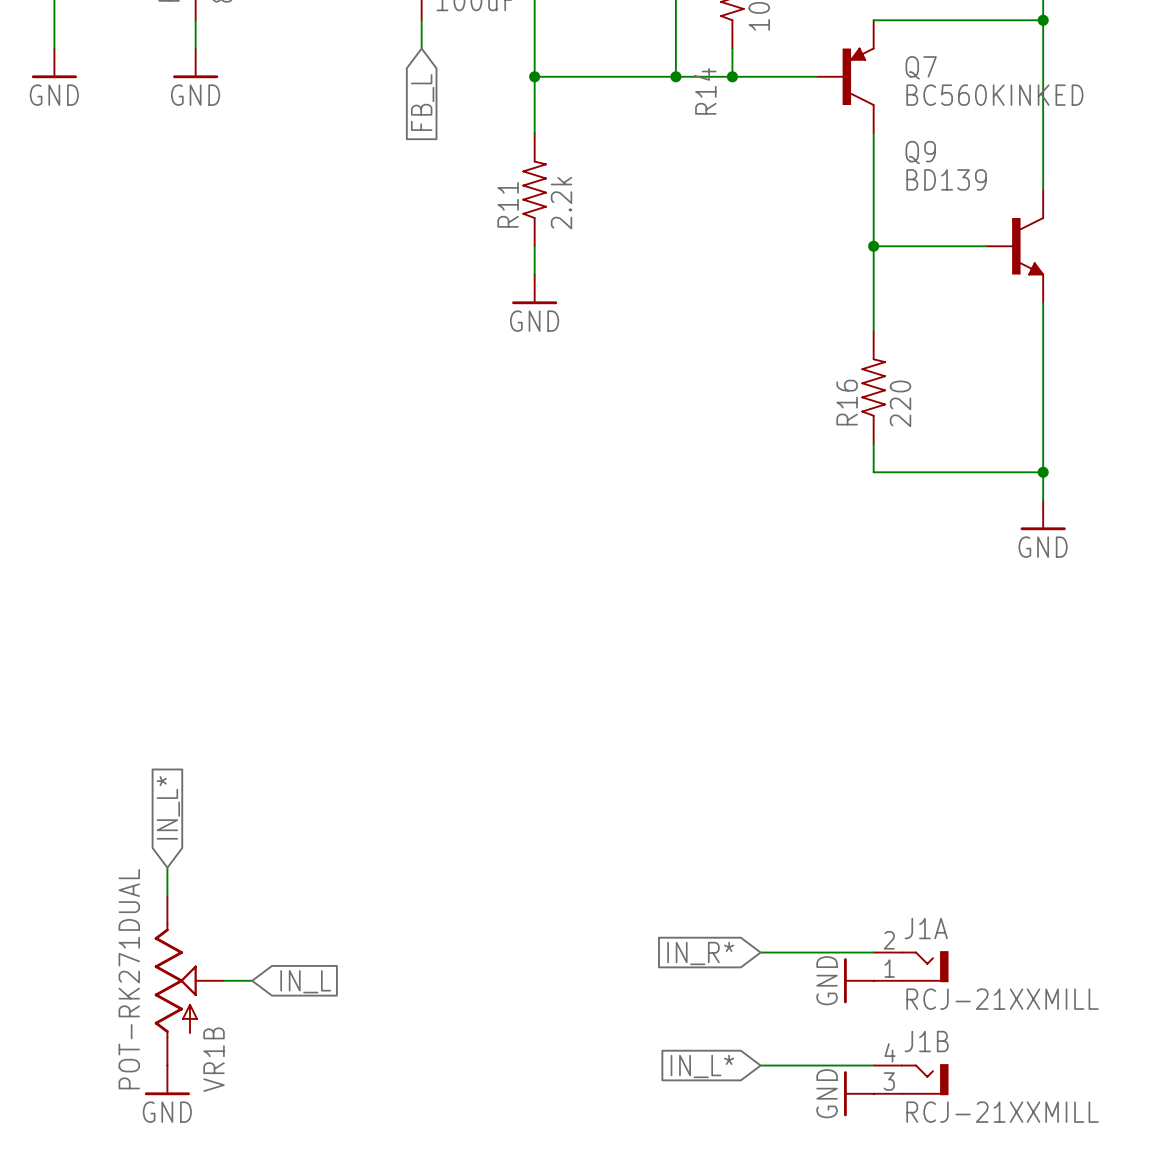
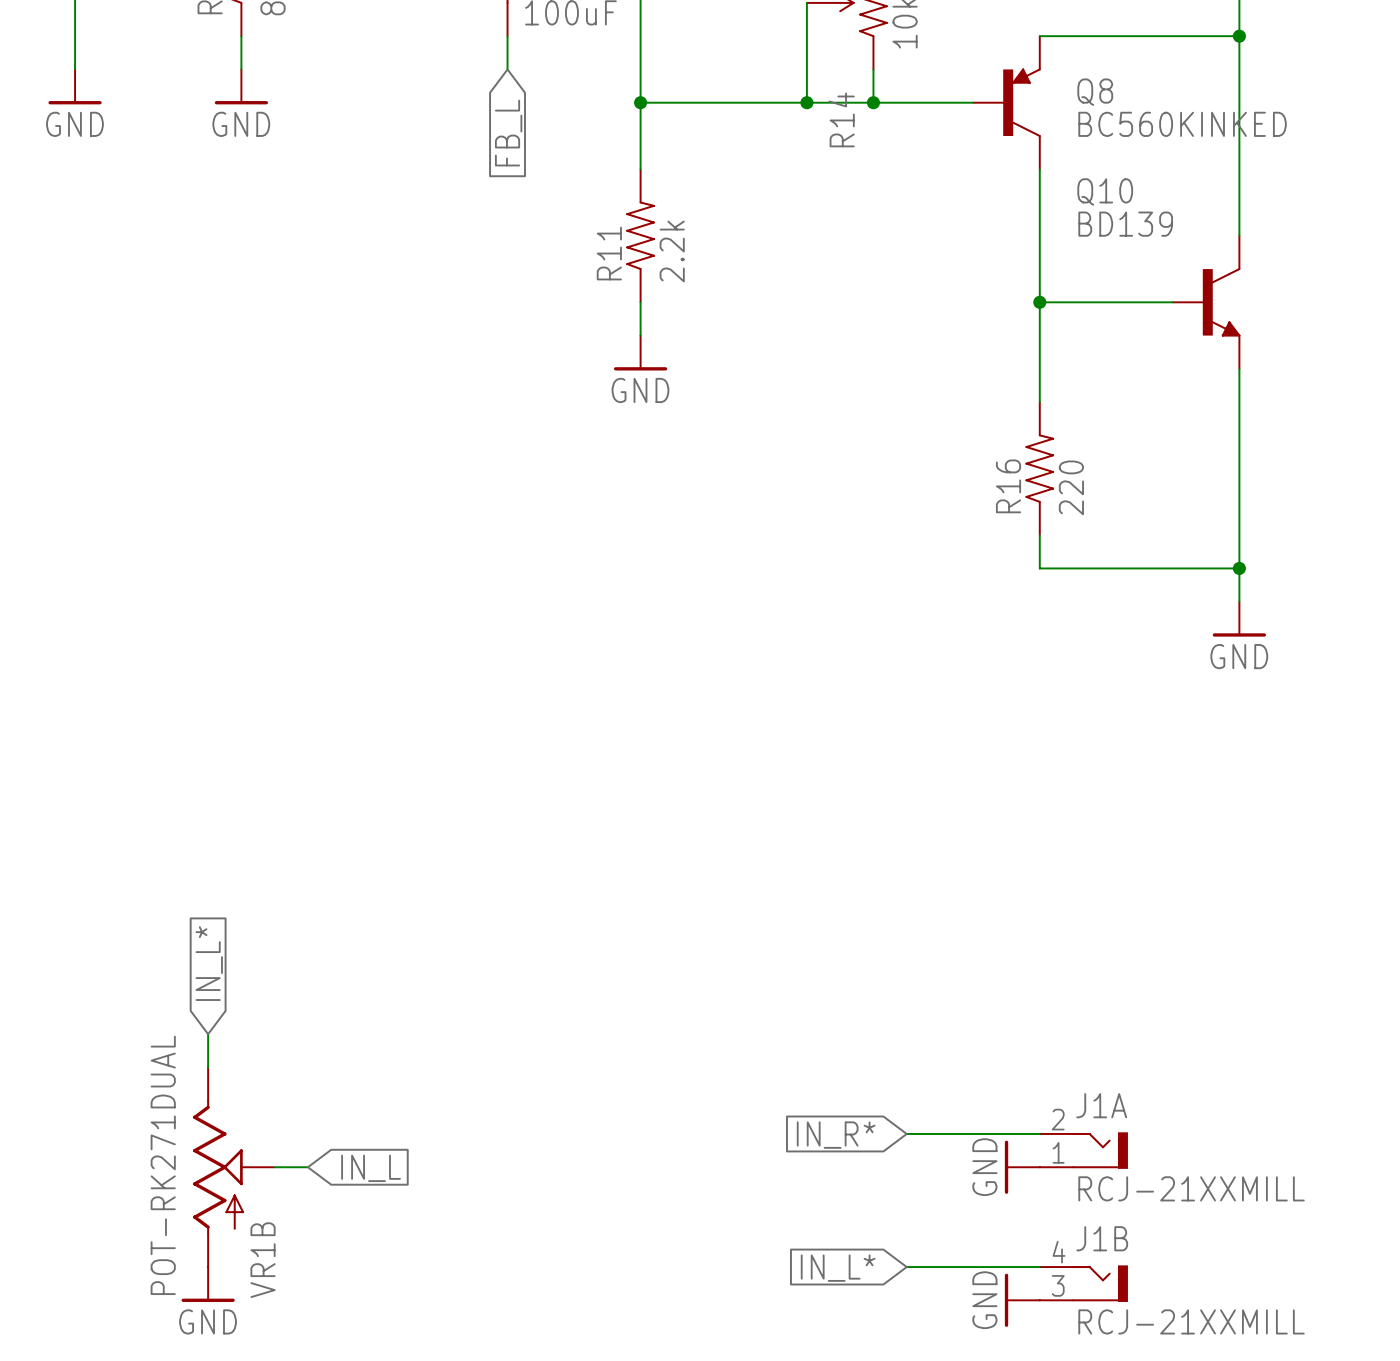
Q7 name: Q7 (921, 67) -> Q8 (1095, 92)
Q9 name: Q9 (920, 152) -> Q10 (1105, 191)

